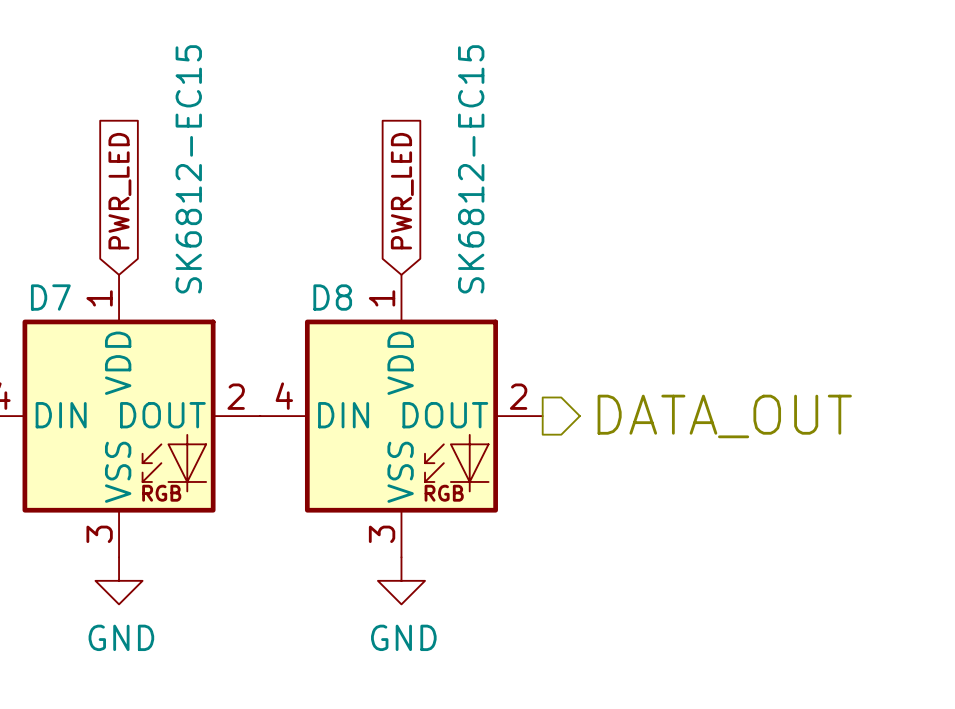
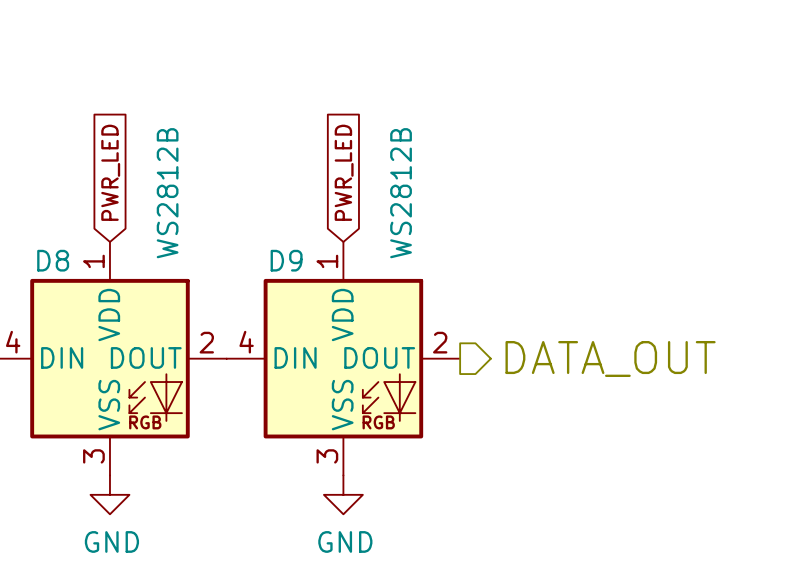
D7 value: SK6812-EC15 (188, 169) -> WS2812B (167, 193)
D8 value: SK6812-EC15 (471, 169) -> WS2812B (401, 193)
D7 name: D7 (50, 297) -> D8 (53, 260)
D8 name: D8 (332, 297) -> D9 (286, 260)

